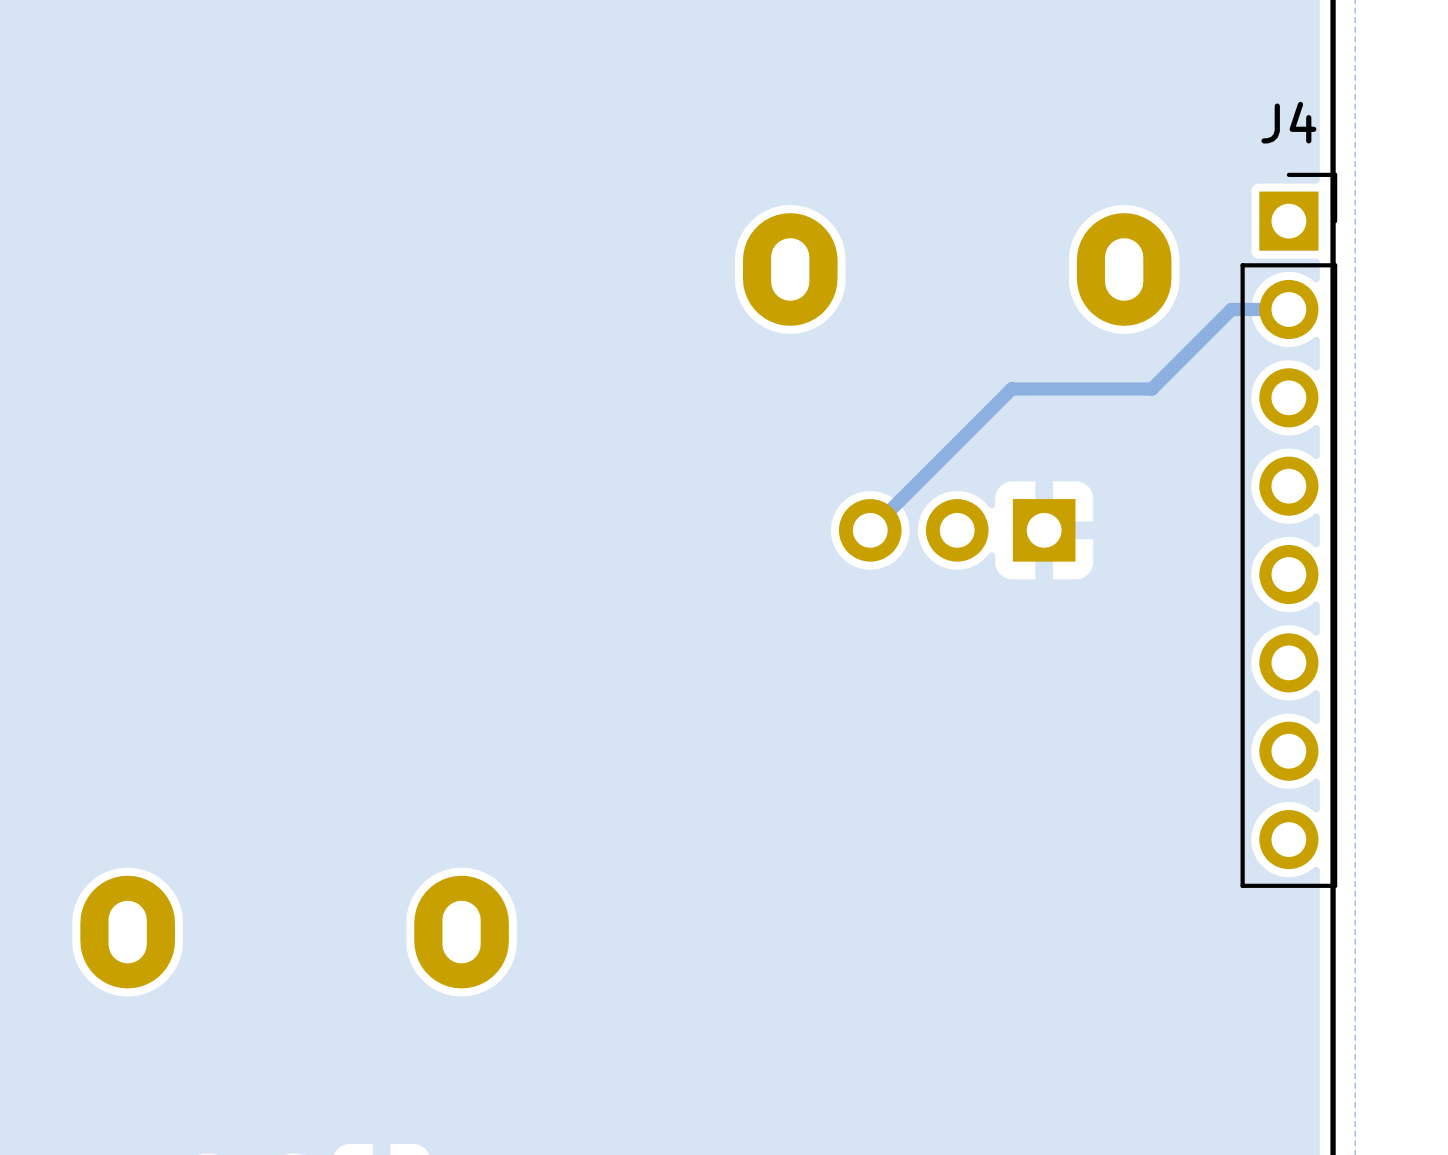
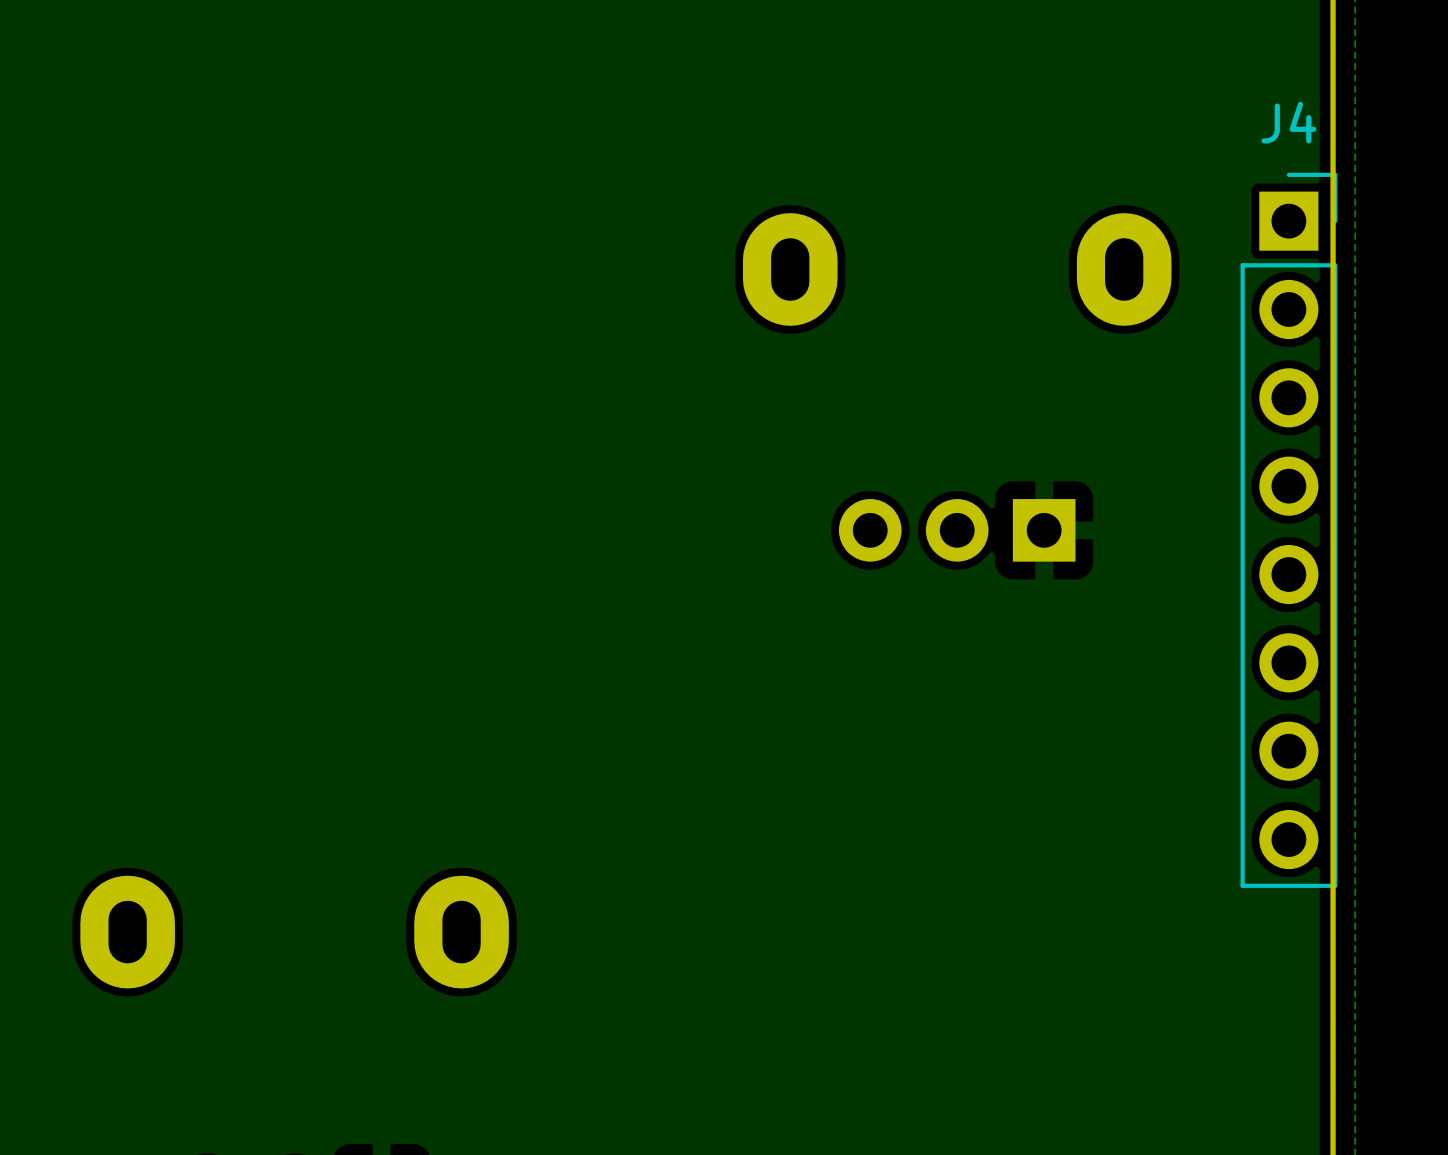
track: (1288, 309) (1231, 309) (1151, 389) (1011, 389) (870, 530) -> none

